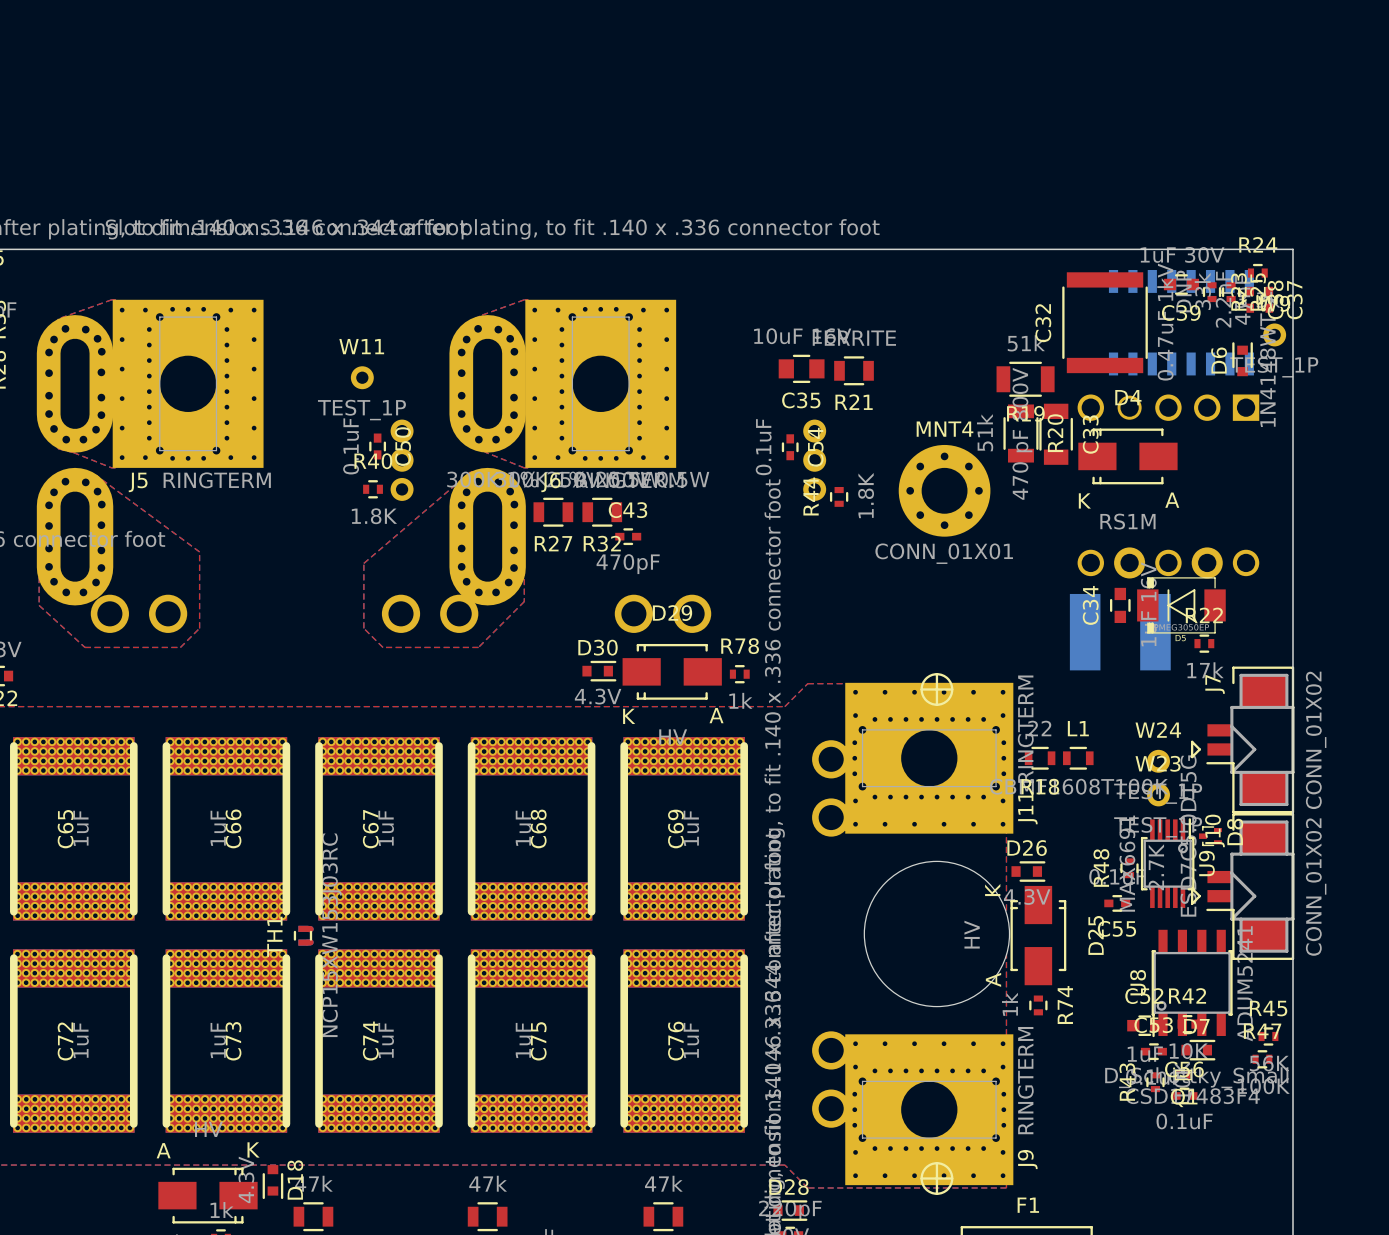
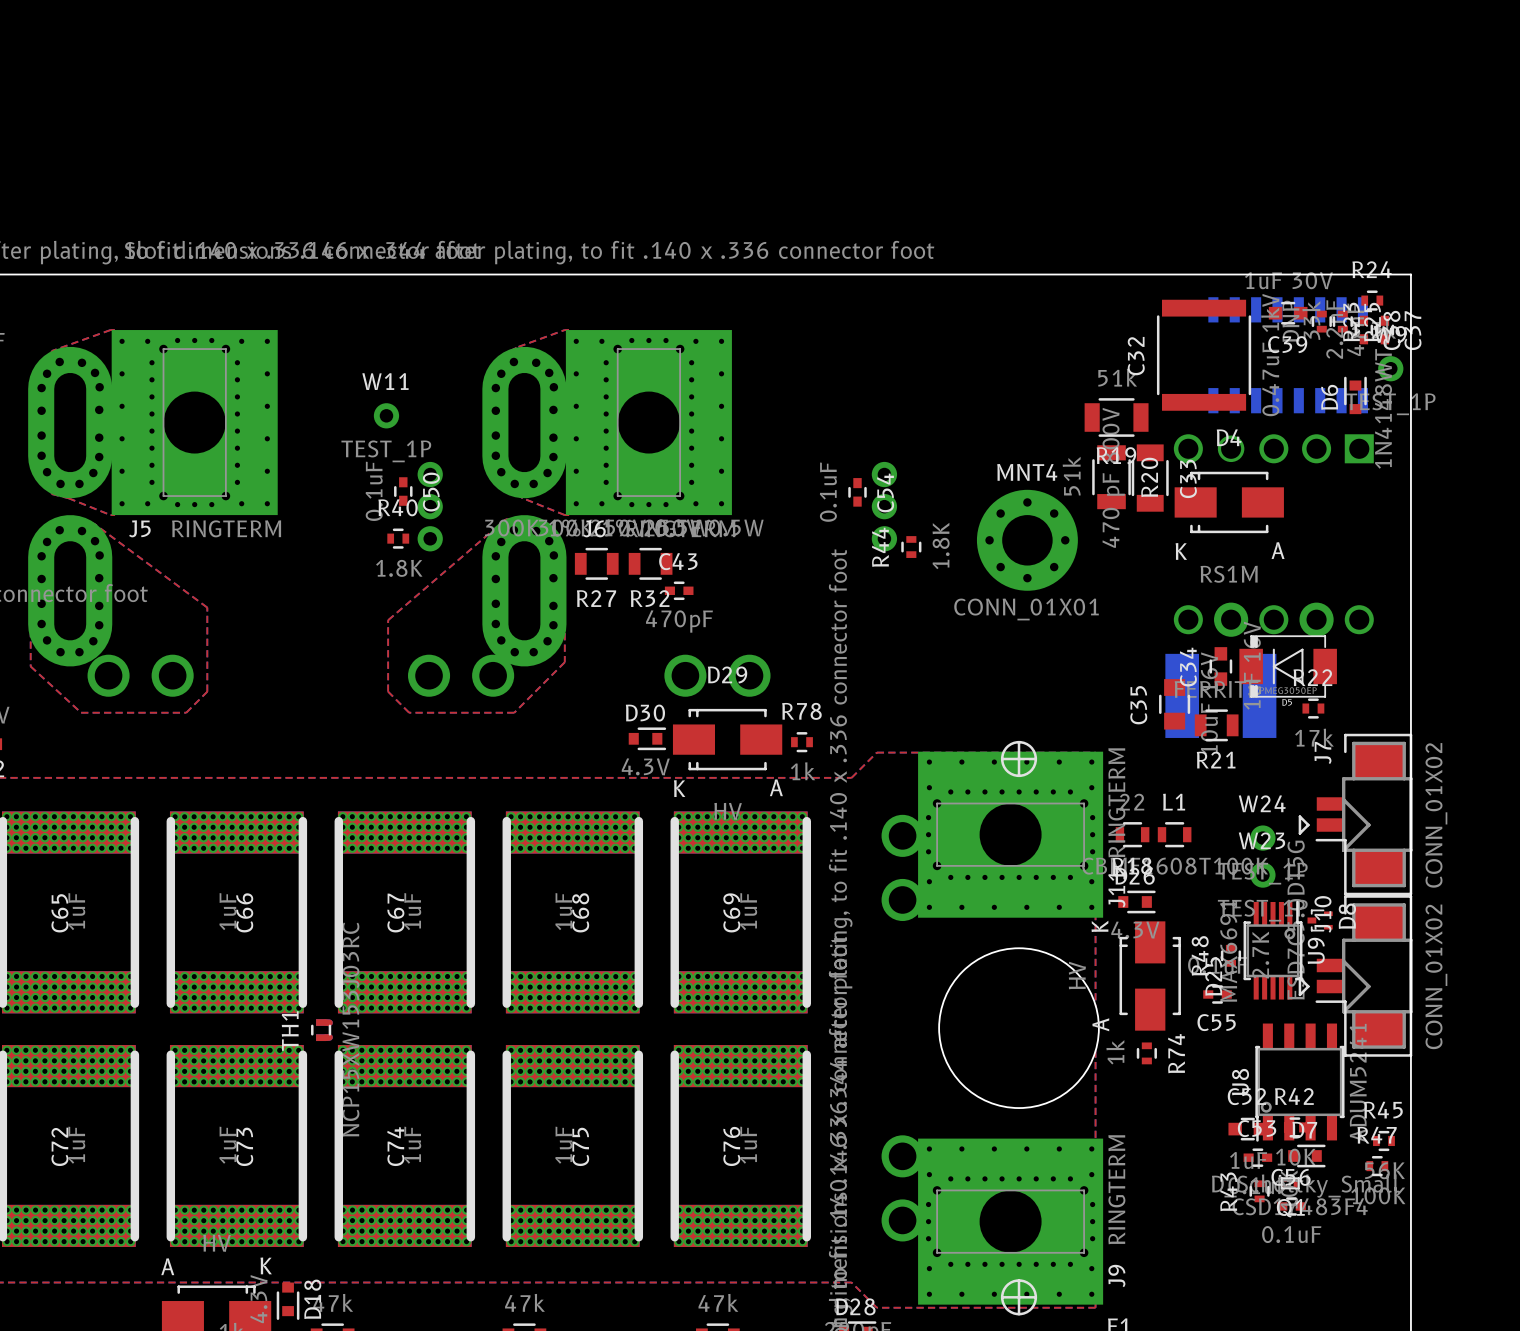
C35 rotation: 0° (801, 368) -> 90° clockwise (1174, 704)
C35 position: (801, 368) -> (1174, 704)
R21 position: (854, 370) -> (1216, 725)
D26 position: (1028, 871) -> (1136, 901)
D25 position: (1038, 935) -> (1150, 976)
R74 position: (1038, 1005) -> (1146, 1053)

